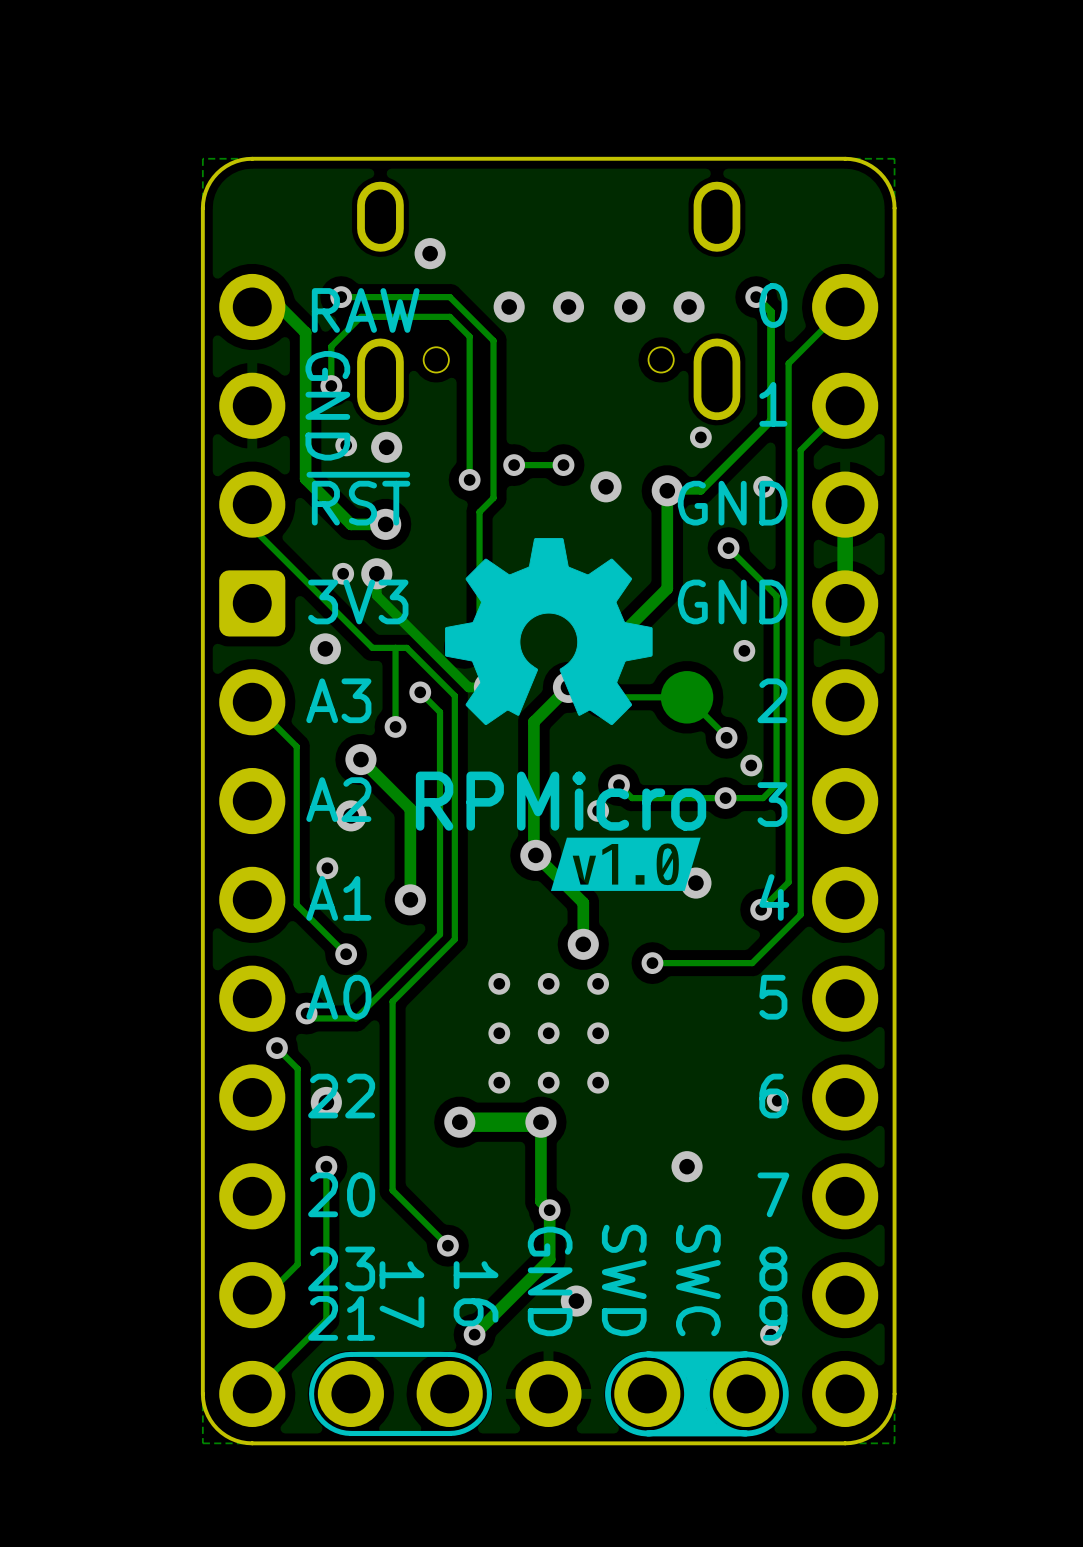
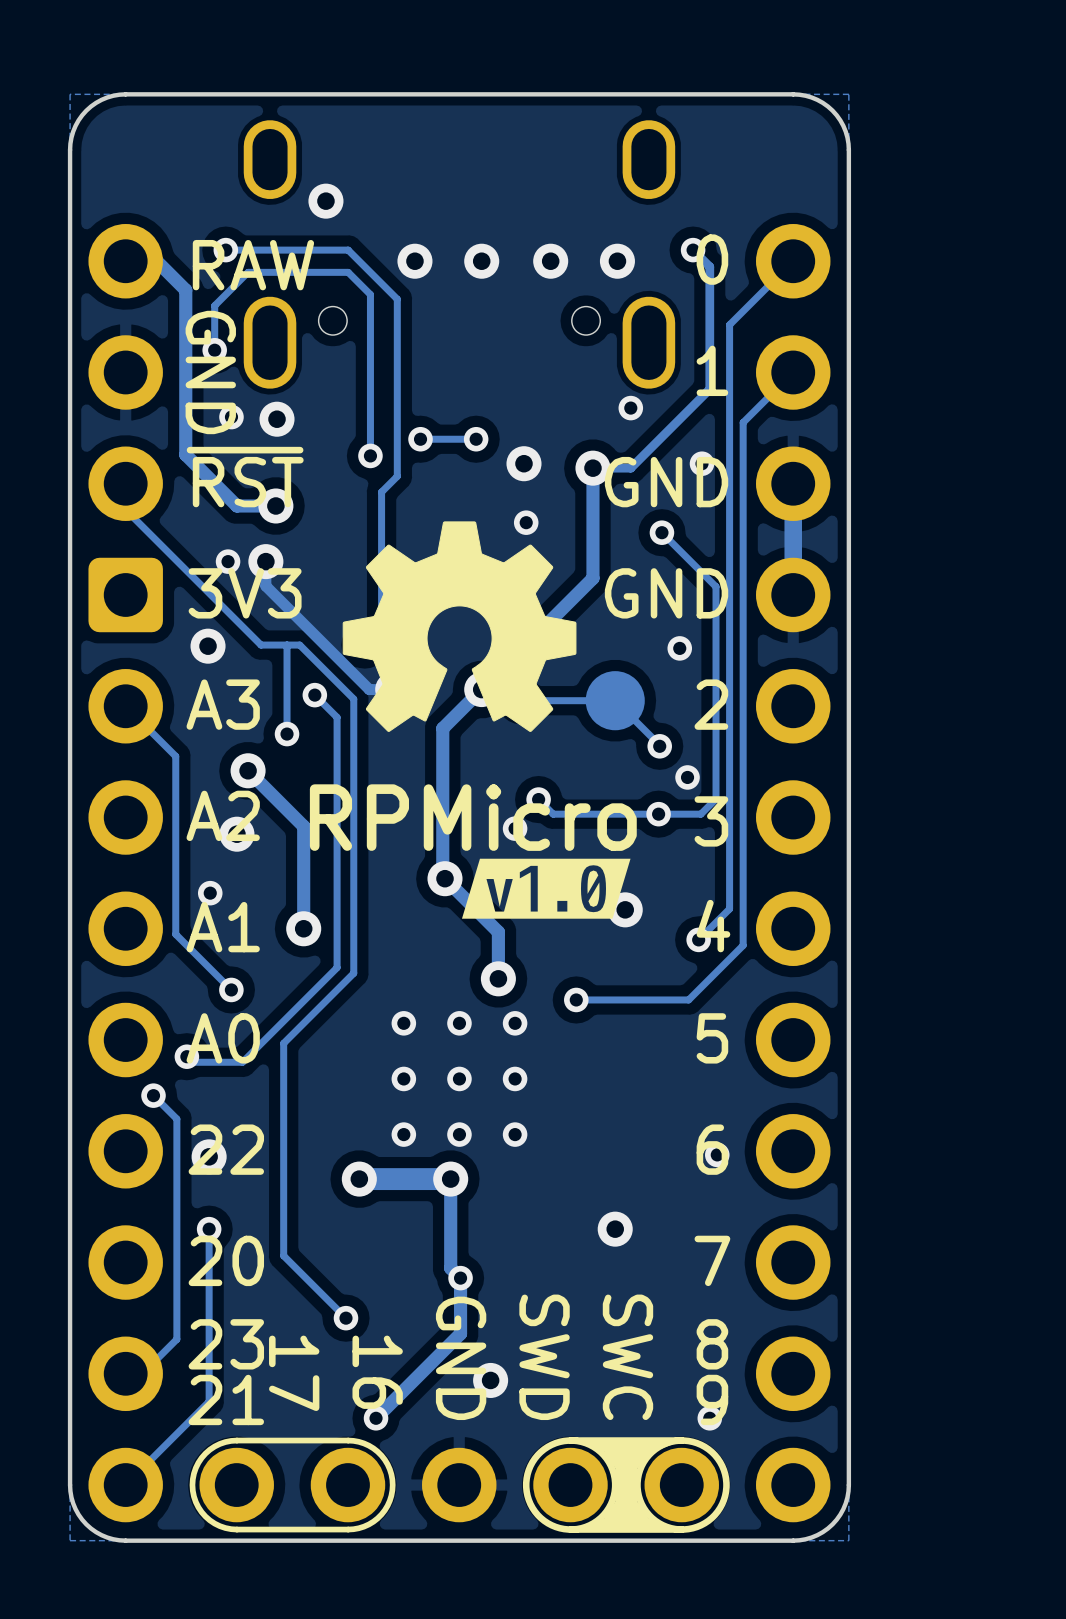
via: none -> (526, 522)

